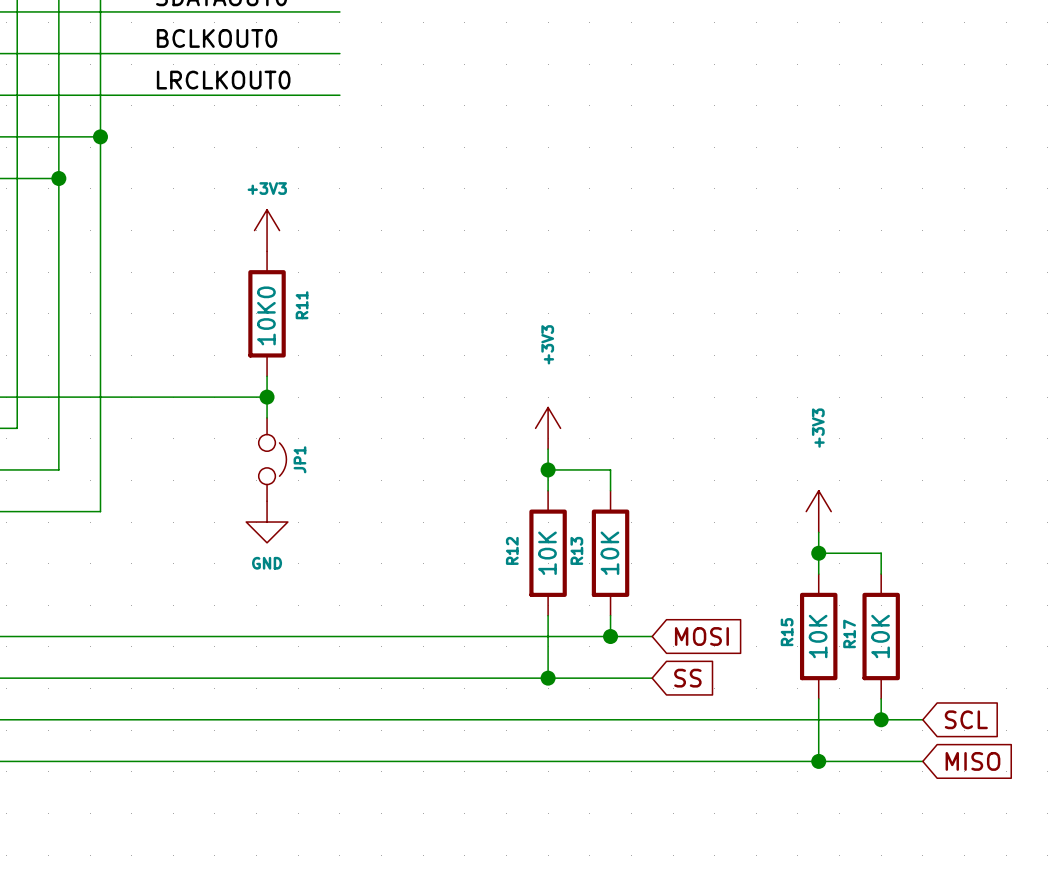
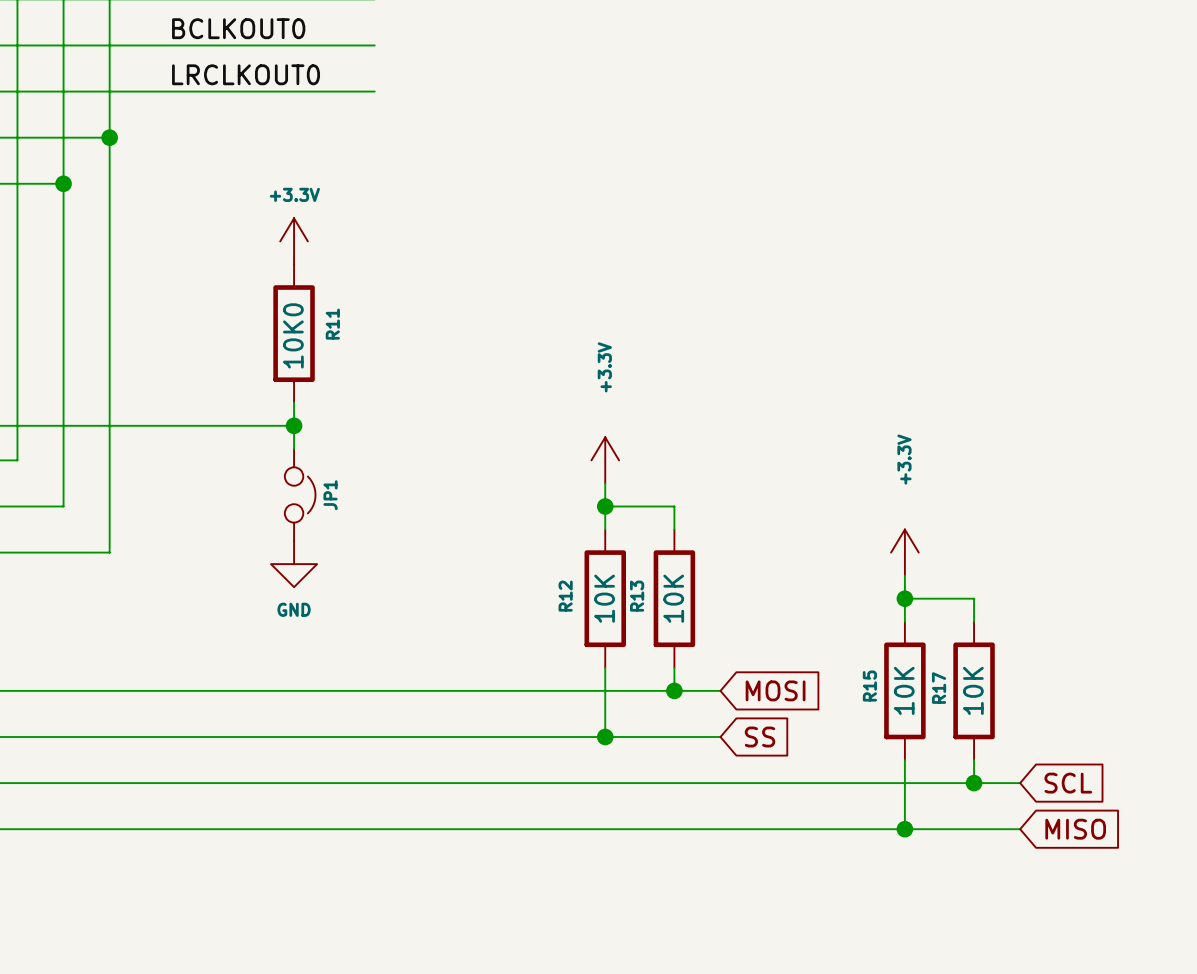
power symbol: +3V3 (267, 230) -> +3.3V (294, 241)
power symbol: +3V3 (548, 428) -> +3.3V (605, 460)
power symbol: +3V3 (818, 511) -> +3.3V (904, 552)

